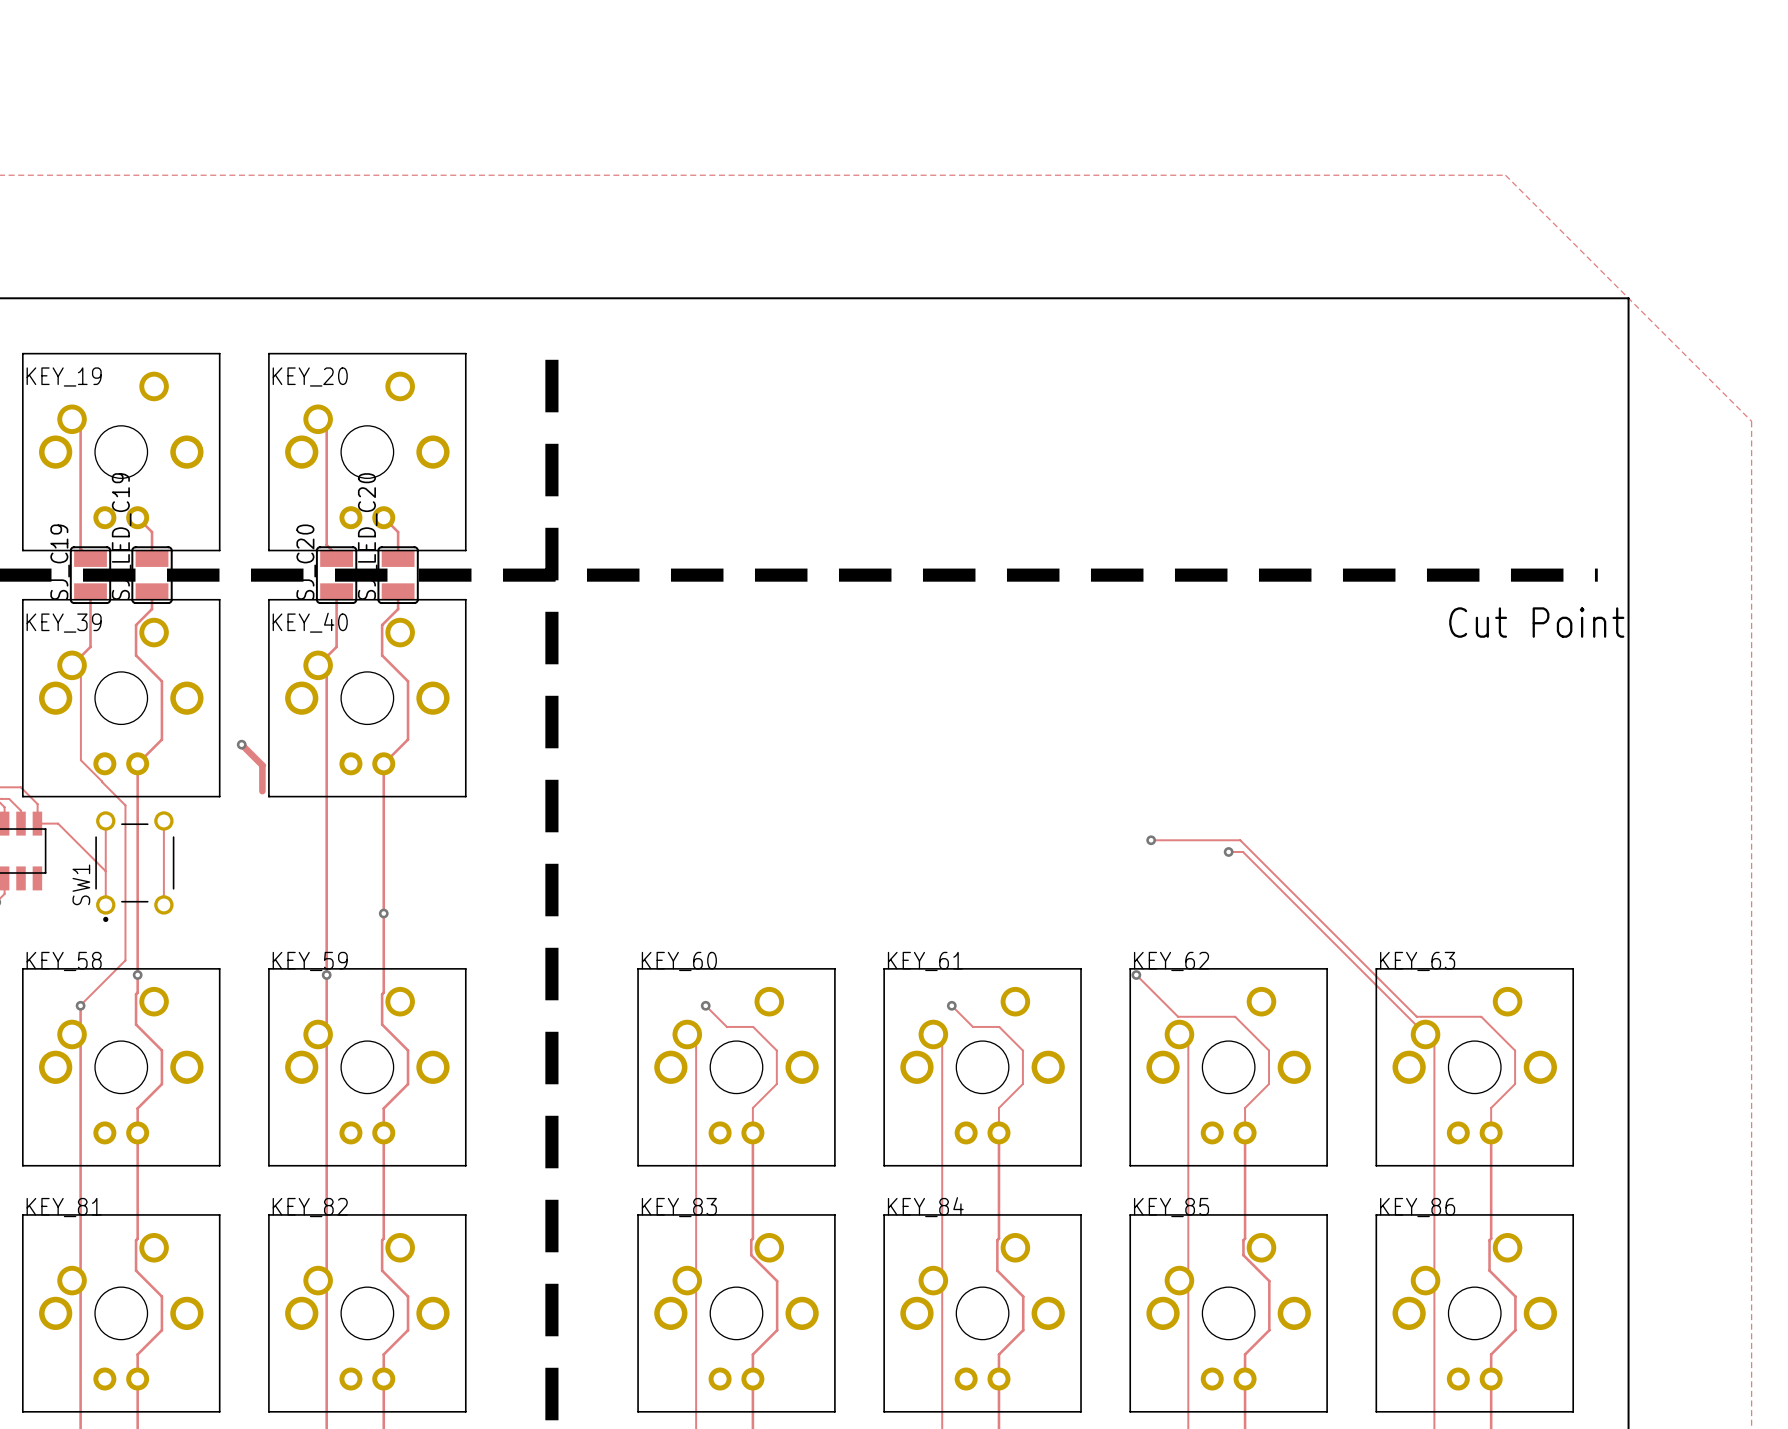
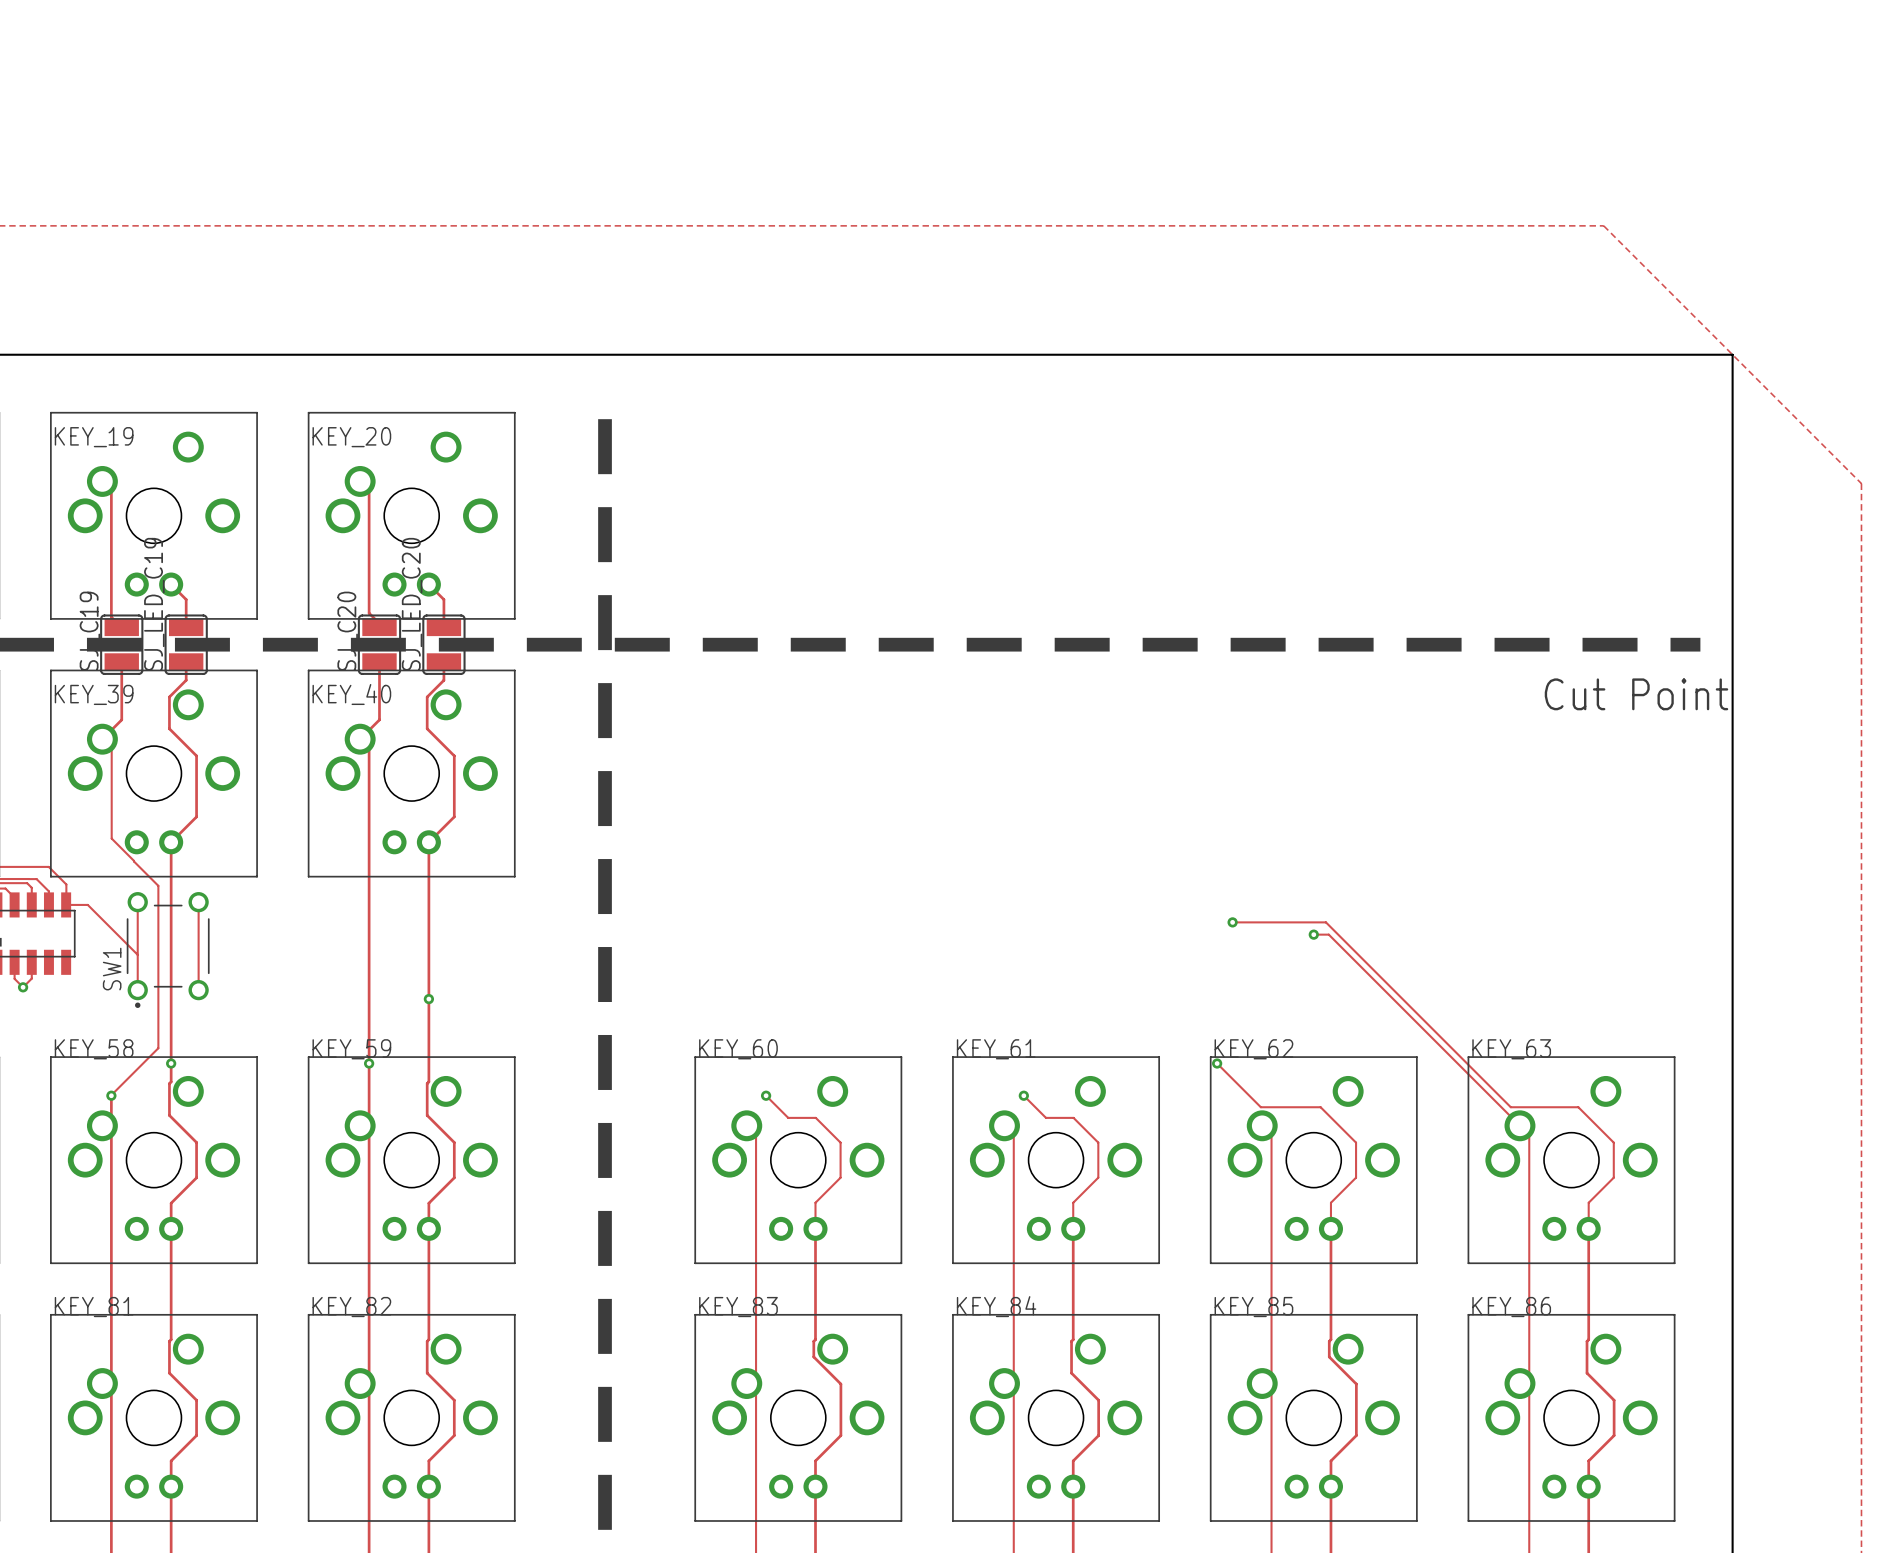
track: (241, 744) (262, 765) (262, 791) -> none
via: (241, 744) -> none

